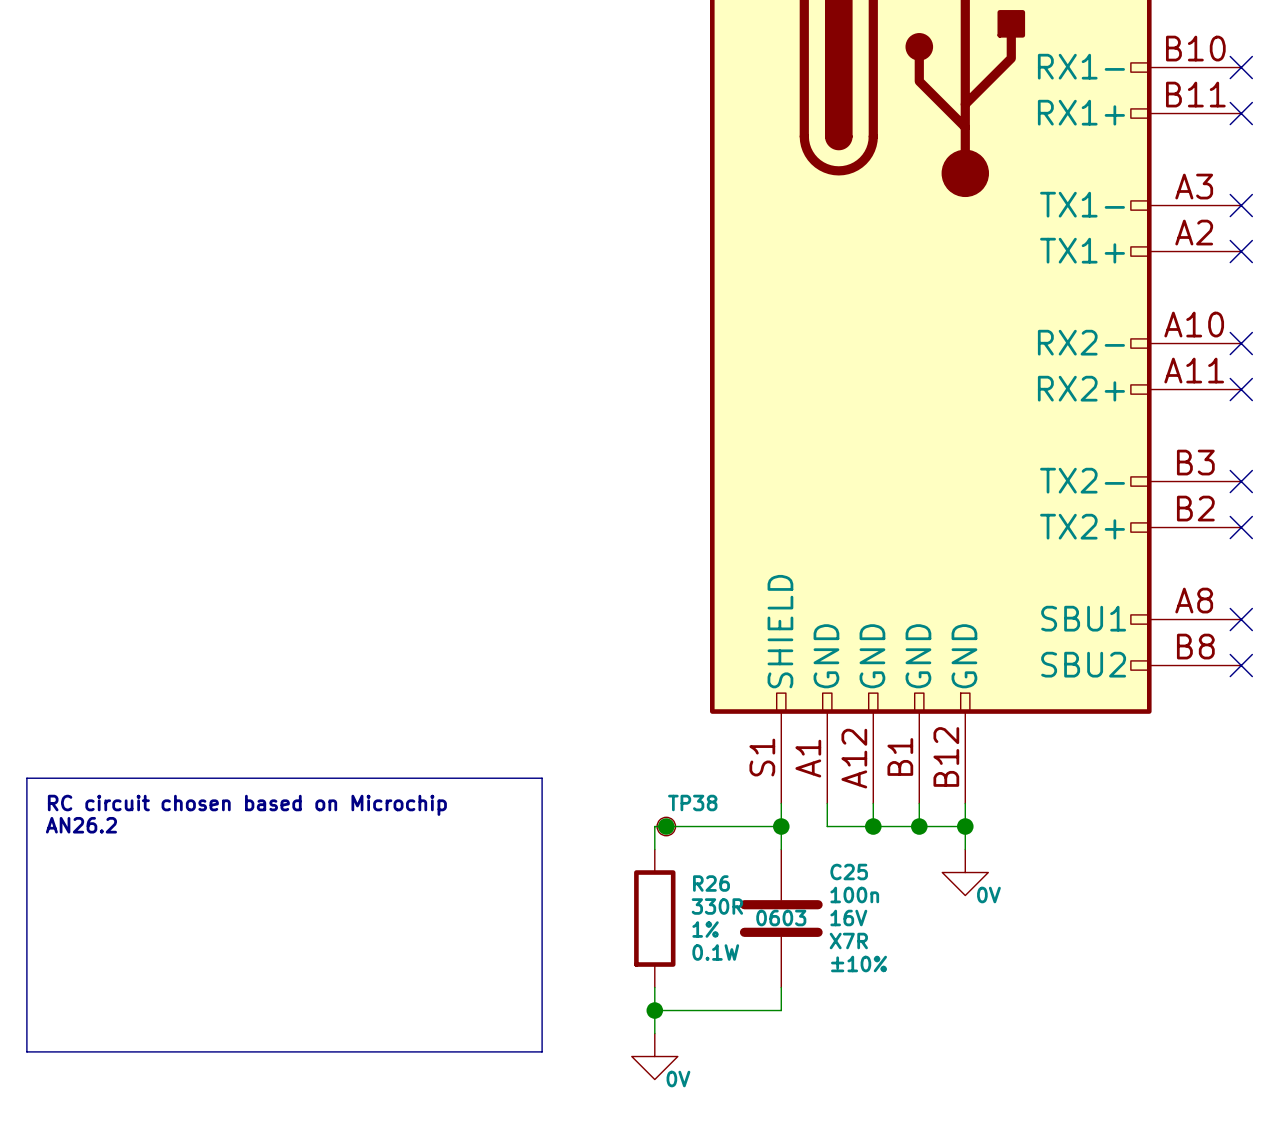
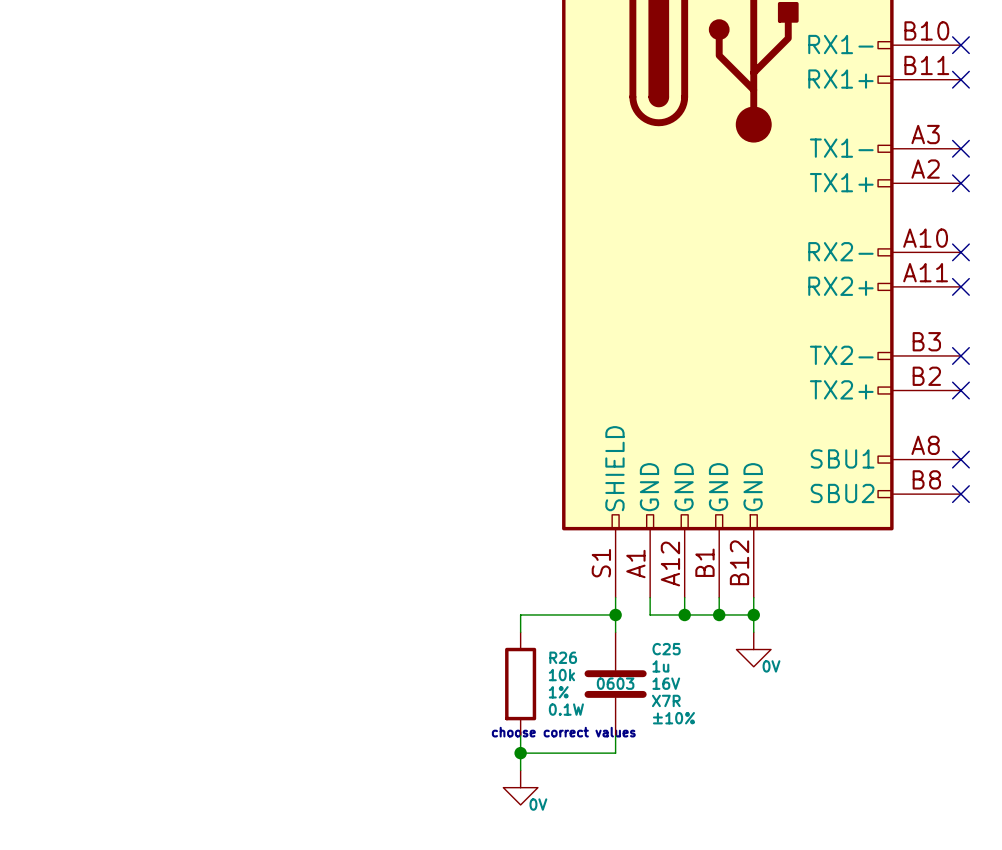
line: (26, 778) (542, 778) (542, 1051) (26, 1051) (26, 778) -> none
text: RC circuit chosen based on Microchip (247, 805) -> none
text: AN26.2 (81, 825) -> none
junction: (666, 826) -> none
TP38: (666, 826) -> none
C25 value: 100n (854, 895) -> 1u (660, 666)
R26 value: 330R (717, 906) -> 10k (561, 675)
text: none -> choose correct values (563, 732)

